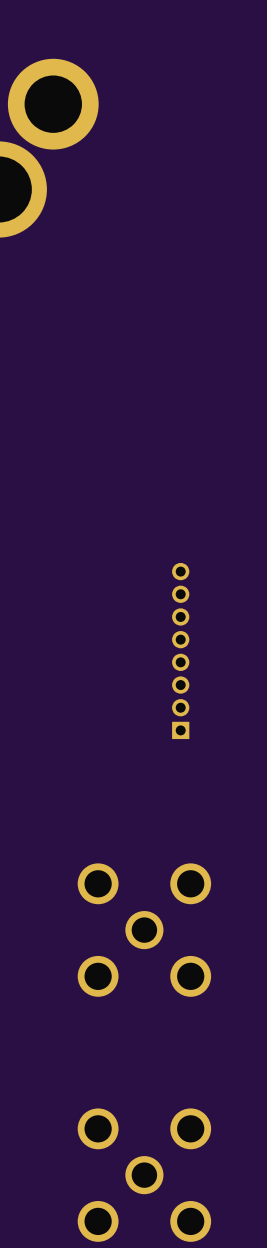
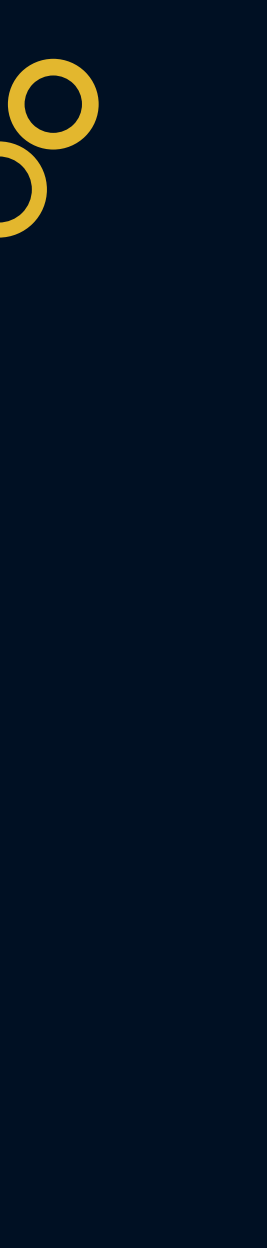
part: (180, 651) -> none
part: (144, 930) -> none
part: (144, 1175) -> none

